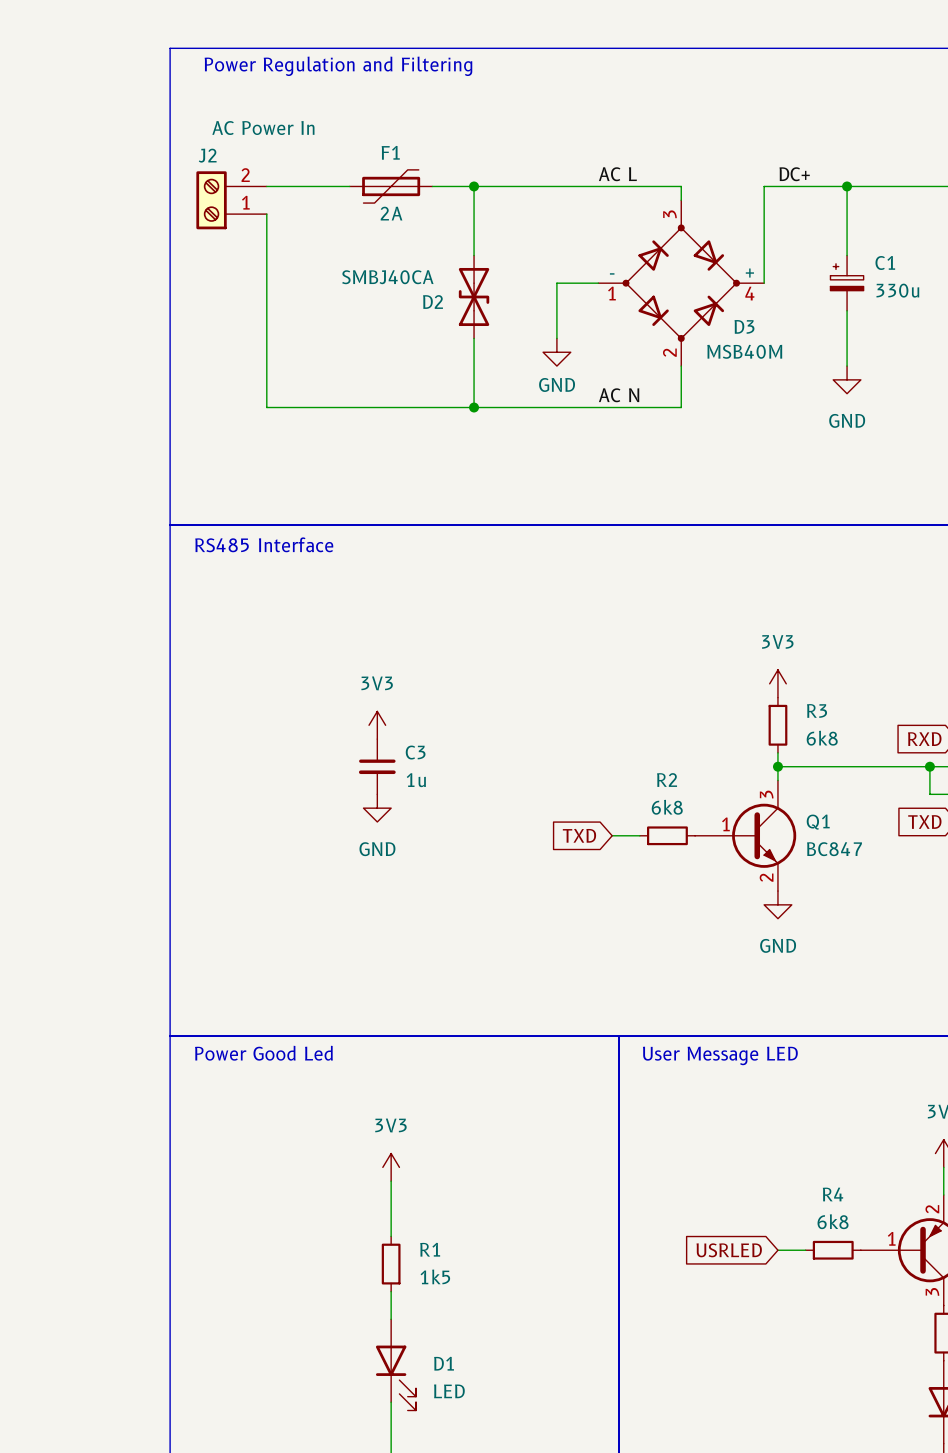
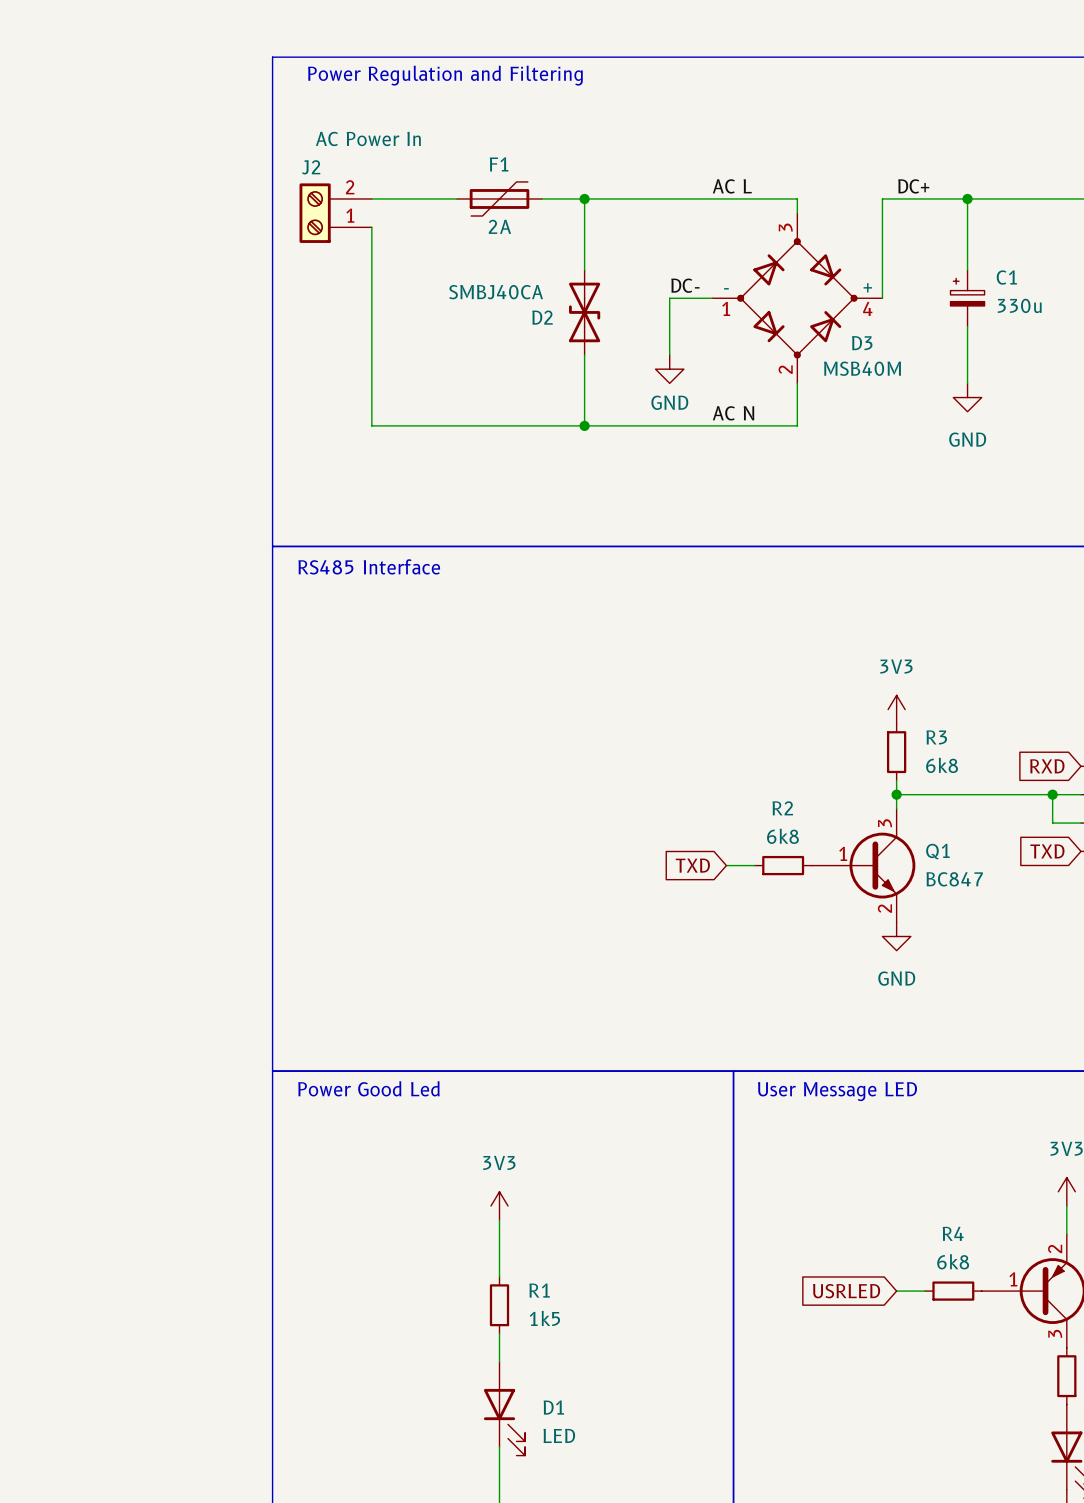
label: none -> DC- (685, 285)
power symbol: 3V3 (377, 725) -> none
C3: 1u (377, 766) -> none
power symbol: GND (377, 808) -> none

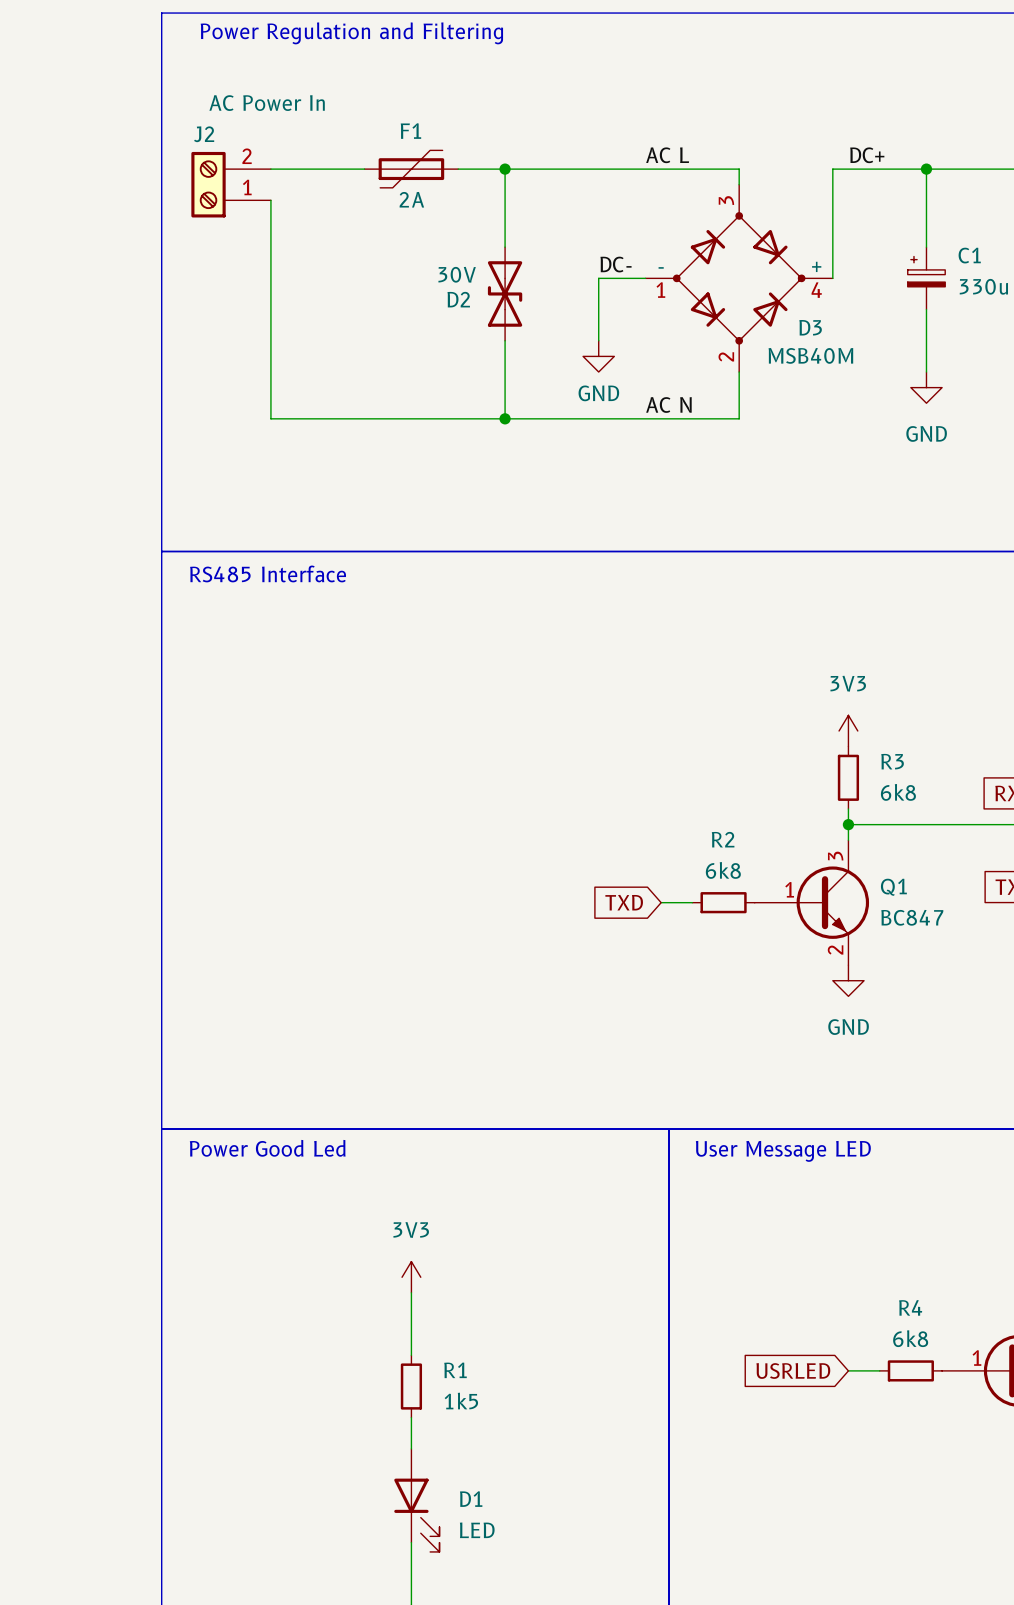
D2 value: SMBJ40CA (496, 292) -> 30V (457, 274)

